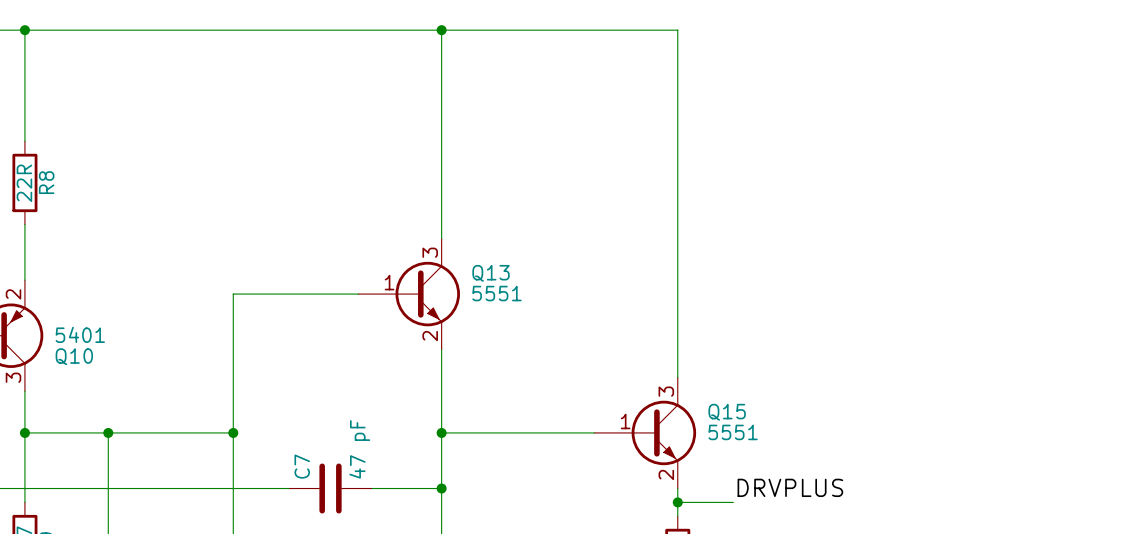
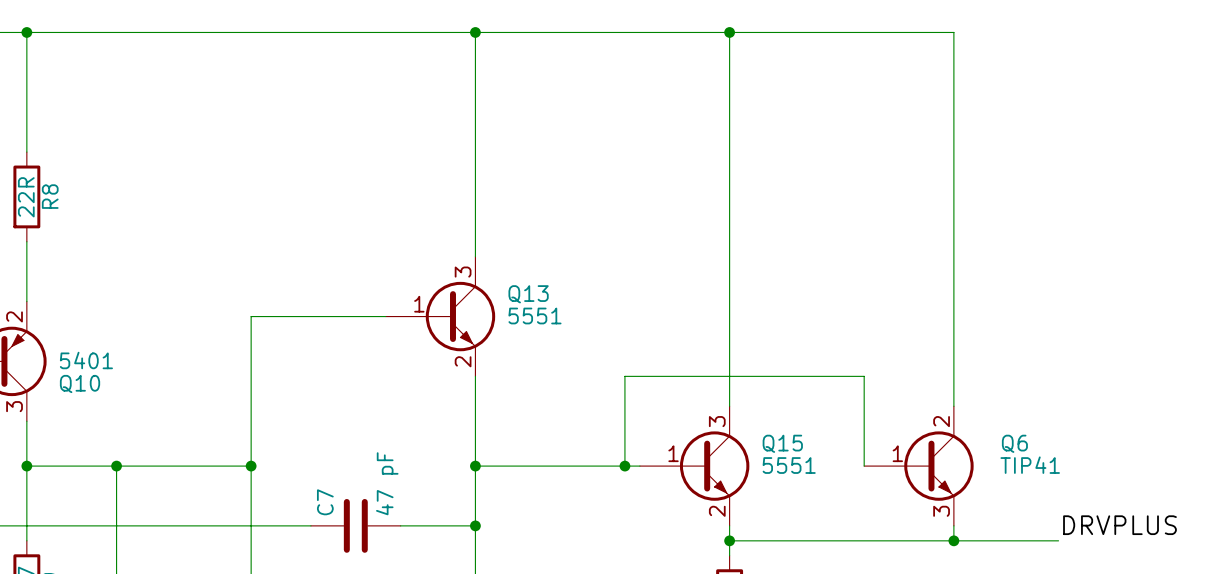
wire: none -> (729, 32) (953, 32) (953, 406)
junction: none -> (729, 32)
wire: none -> (624, 466) (624, 376) (864, 376) (864, 466)
junction: none -> (624, 466)
Q6: none -> TIP41 (918, 466)
label position: DRVPLUS (790, 487) -> DRVPLUS (1119, 525)
wire: none -> (953, 525) (953, 540)
wire: none -> (789, 540) (1058, 540)
junction: none -> (953, 540)

